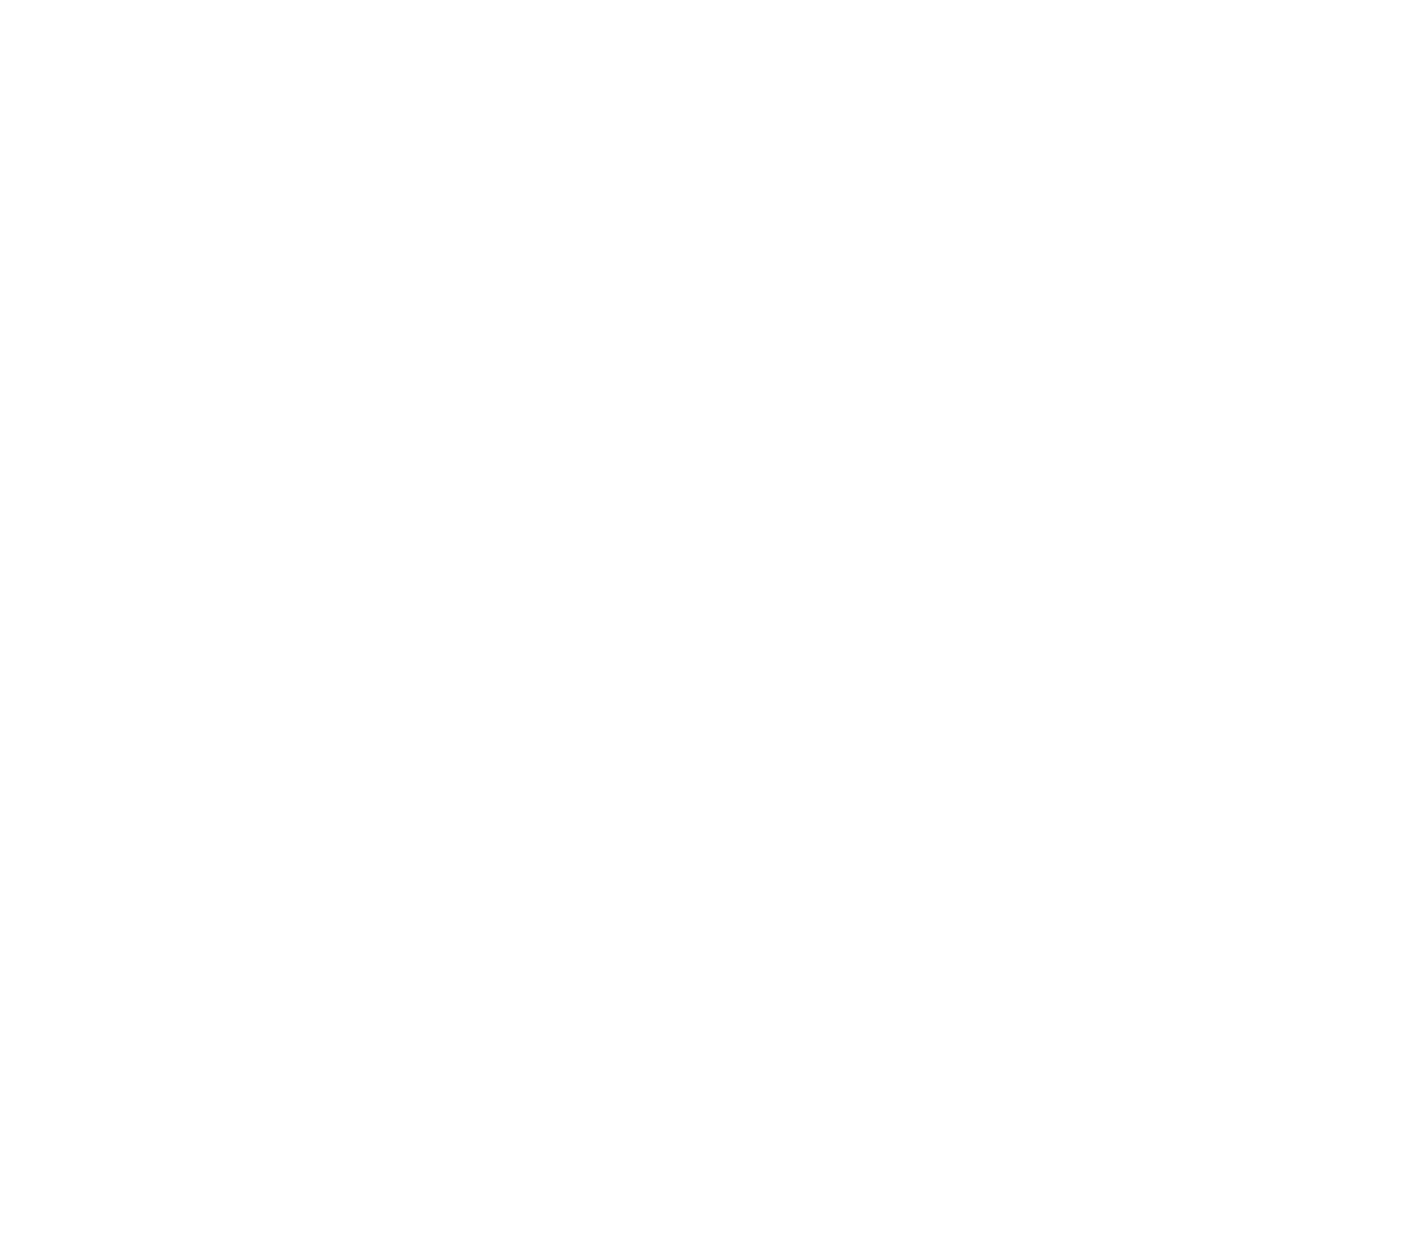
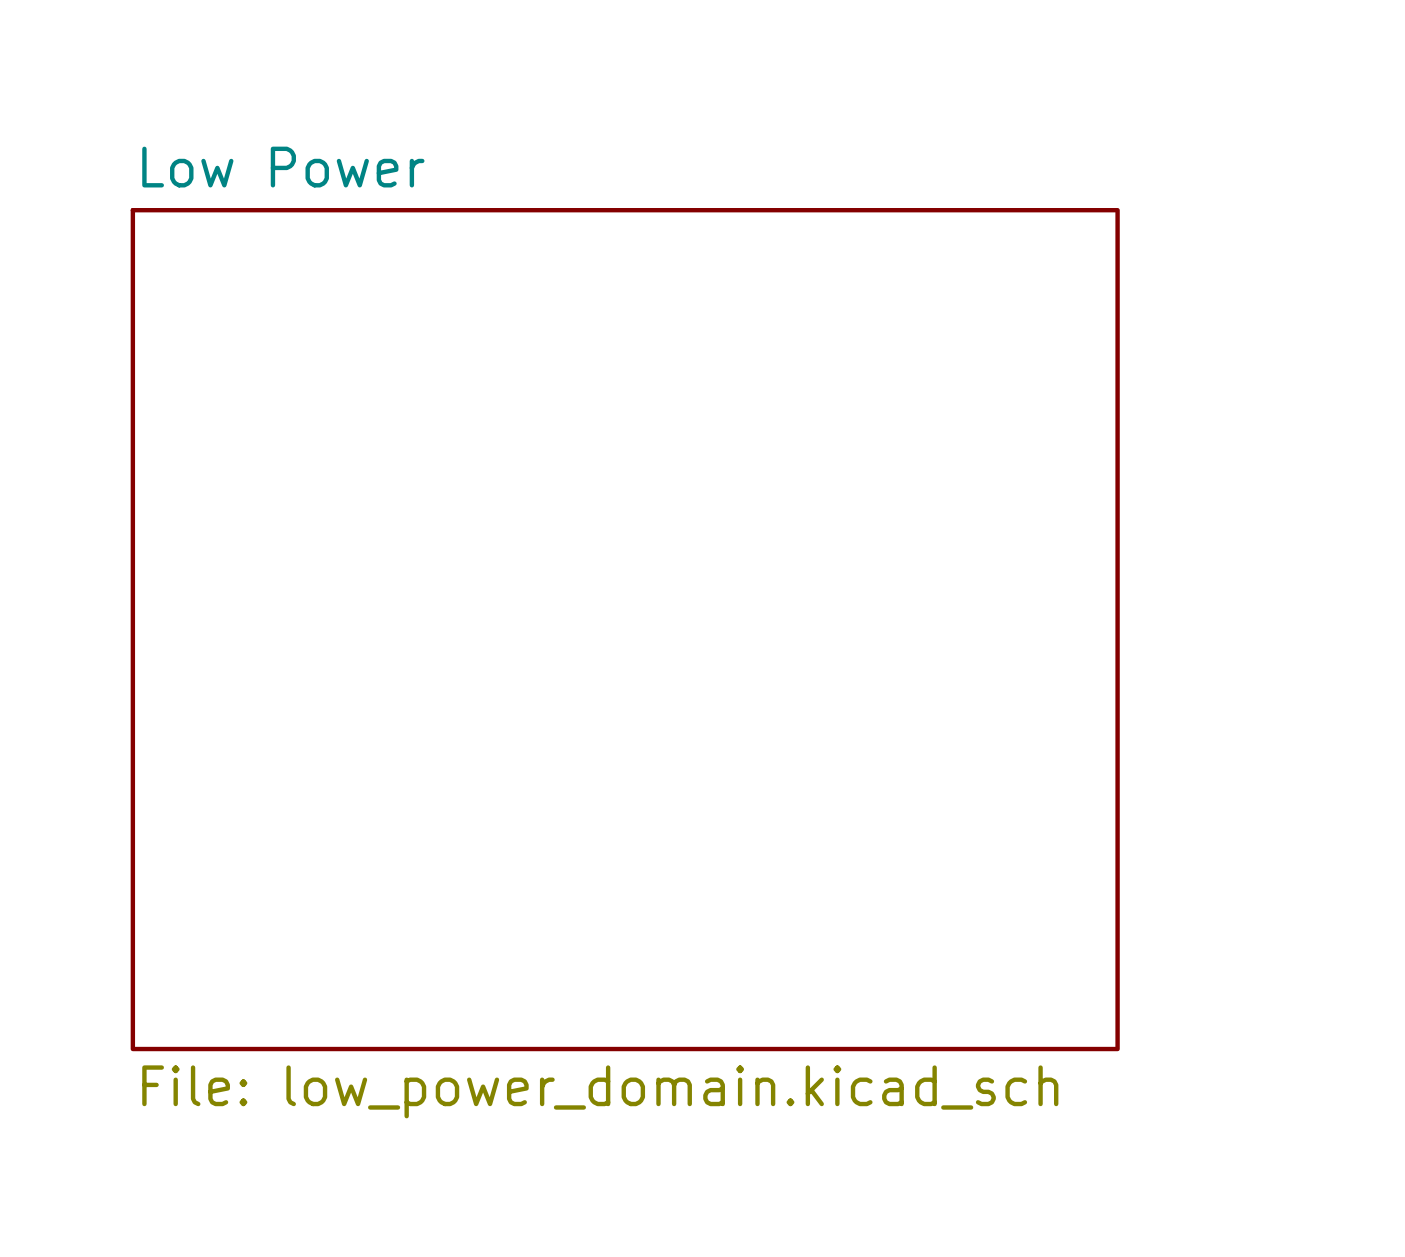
sheet Low Power: none -> File: low_power_domain.kicad_sch (625, 629)

